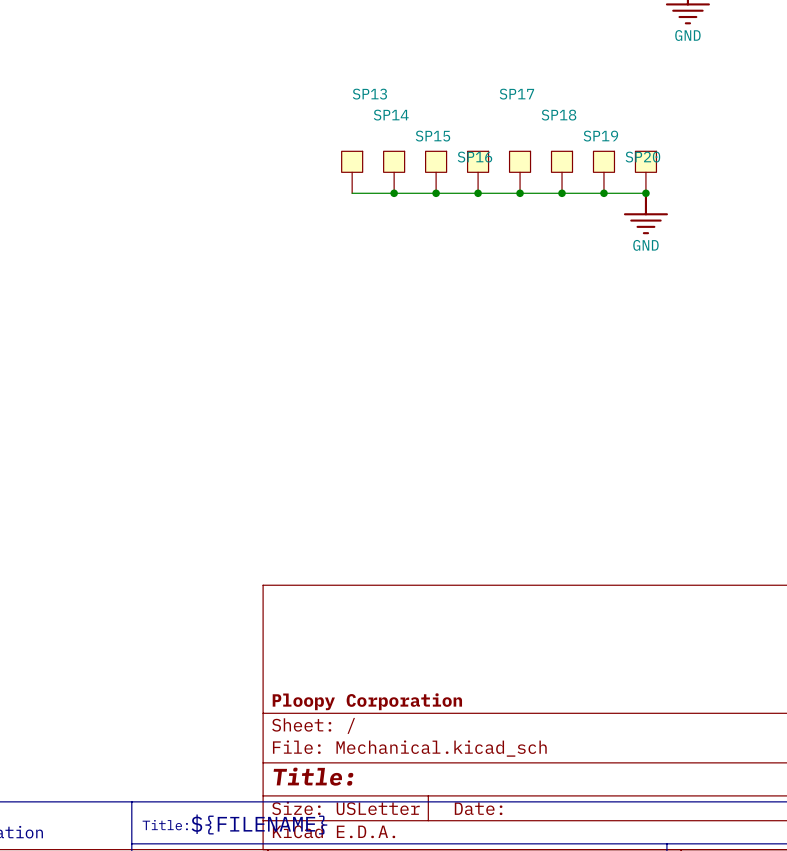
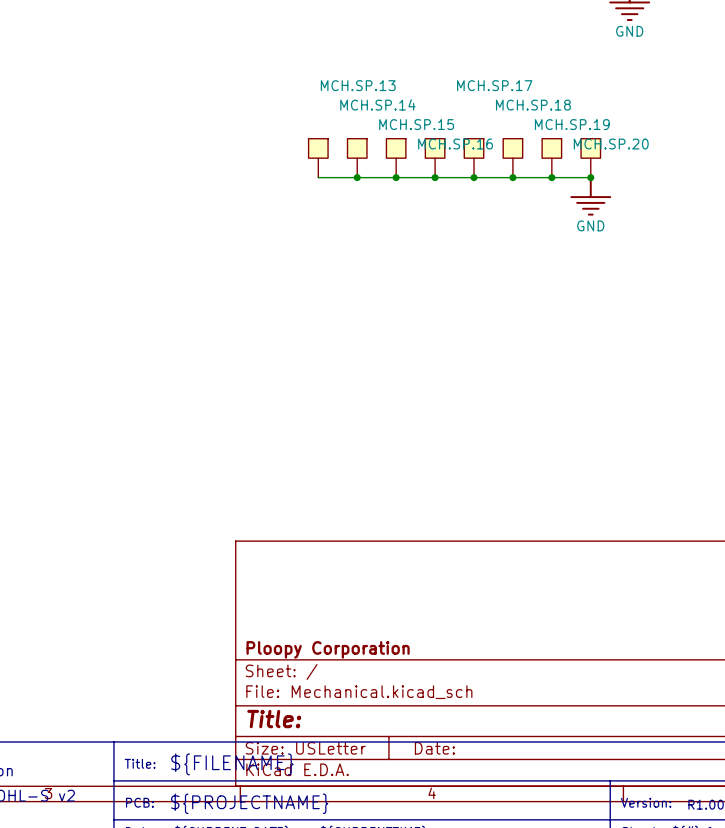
SP13 name: SP13 (369, 94) -> MCH.SP.13 (358, 85)
SP17 name: SP17 (516, 94) -> MCH.SP.17 (494, 85)
SP14 name: SP14 (391, 115) -> MCH.SP.14 (377, 104)
SP18 name: SP18 (558, 115) -> MCH.SP.18 (533, 105)
SP15 name: SP15 (432, 136) -> MCH.SP.15 (416, 124)
SP19 name: SP19 (600, 136) -> MCH.SP.19 (572, 124)
SP16 name: SP16 (474, 157) -> MCH.SP.16 (455, 144)
SP20 name: SP20 (642, 157) -> MCH.SP.20 (611, 144)

